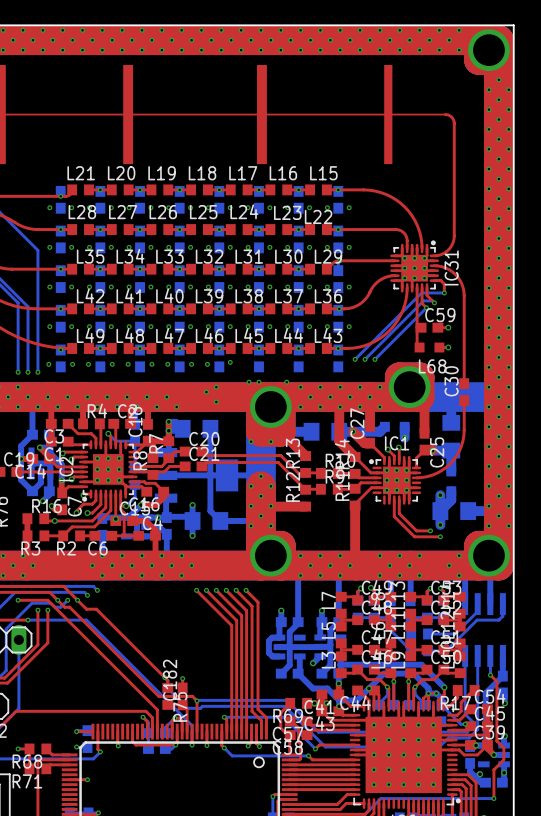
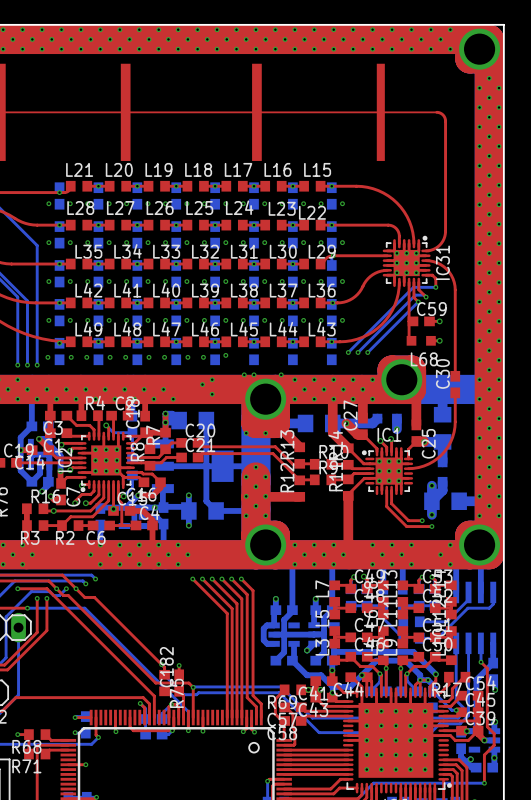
top track: (224, 717) (226, 719) (226, 731) -> none
bottom track: (224, 717) (283, 717) (315, 748) -> none
via: (224, 717) -> none
top track: (221, 731) (221, 745) (224, 747) -> none
top track: (355, 745) (319, 745) (315, 748) -> none
bottom track: (224, 747) (232, 755) (308, 755) -> none
via: (224, 747) -> none
via: (315, 748) -> none
top track: (308, 755) (312, 759) (355, 759) -> none
via: (308, 755) -> none

